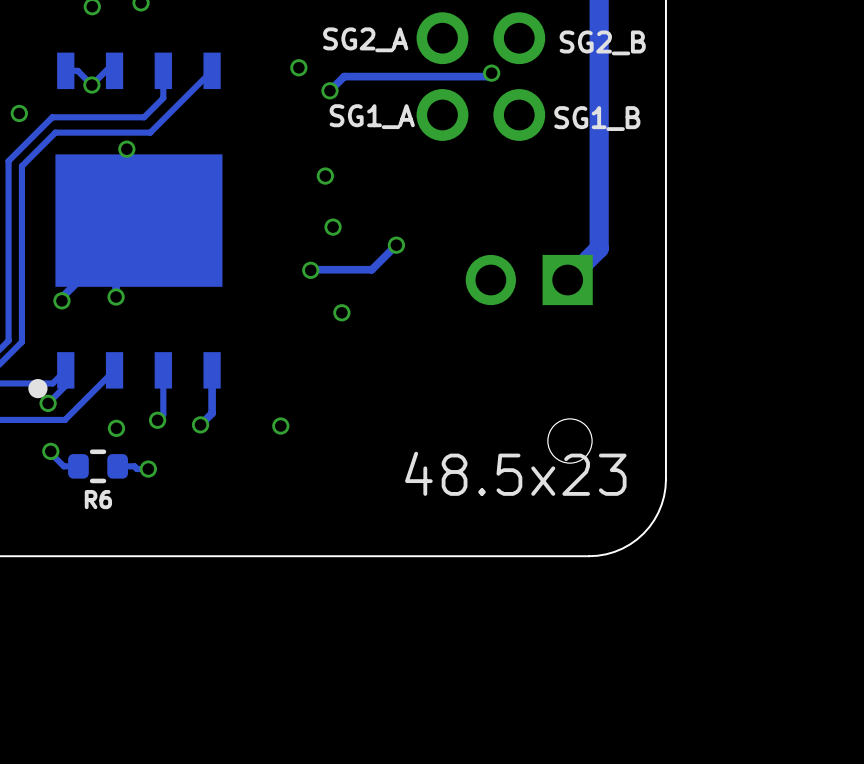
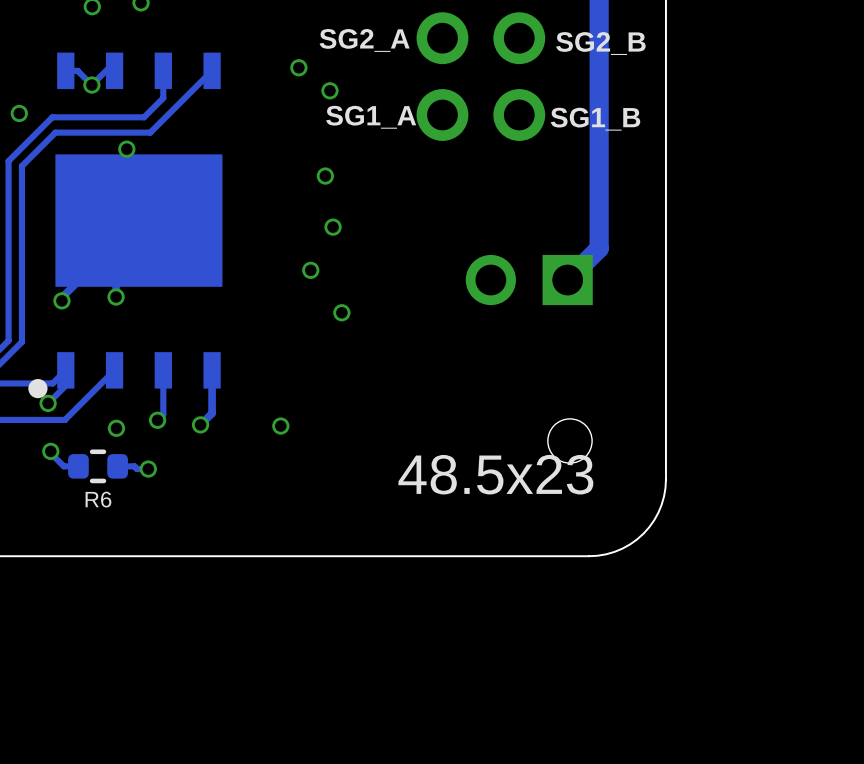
track: (491, 73) (488, 76) (344, 76) (329, 90) -> none
via: (491, 73) -> none
track: (396, 245) (371, 269) (310, 270) -> none
via: (396, 245) -> none

